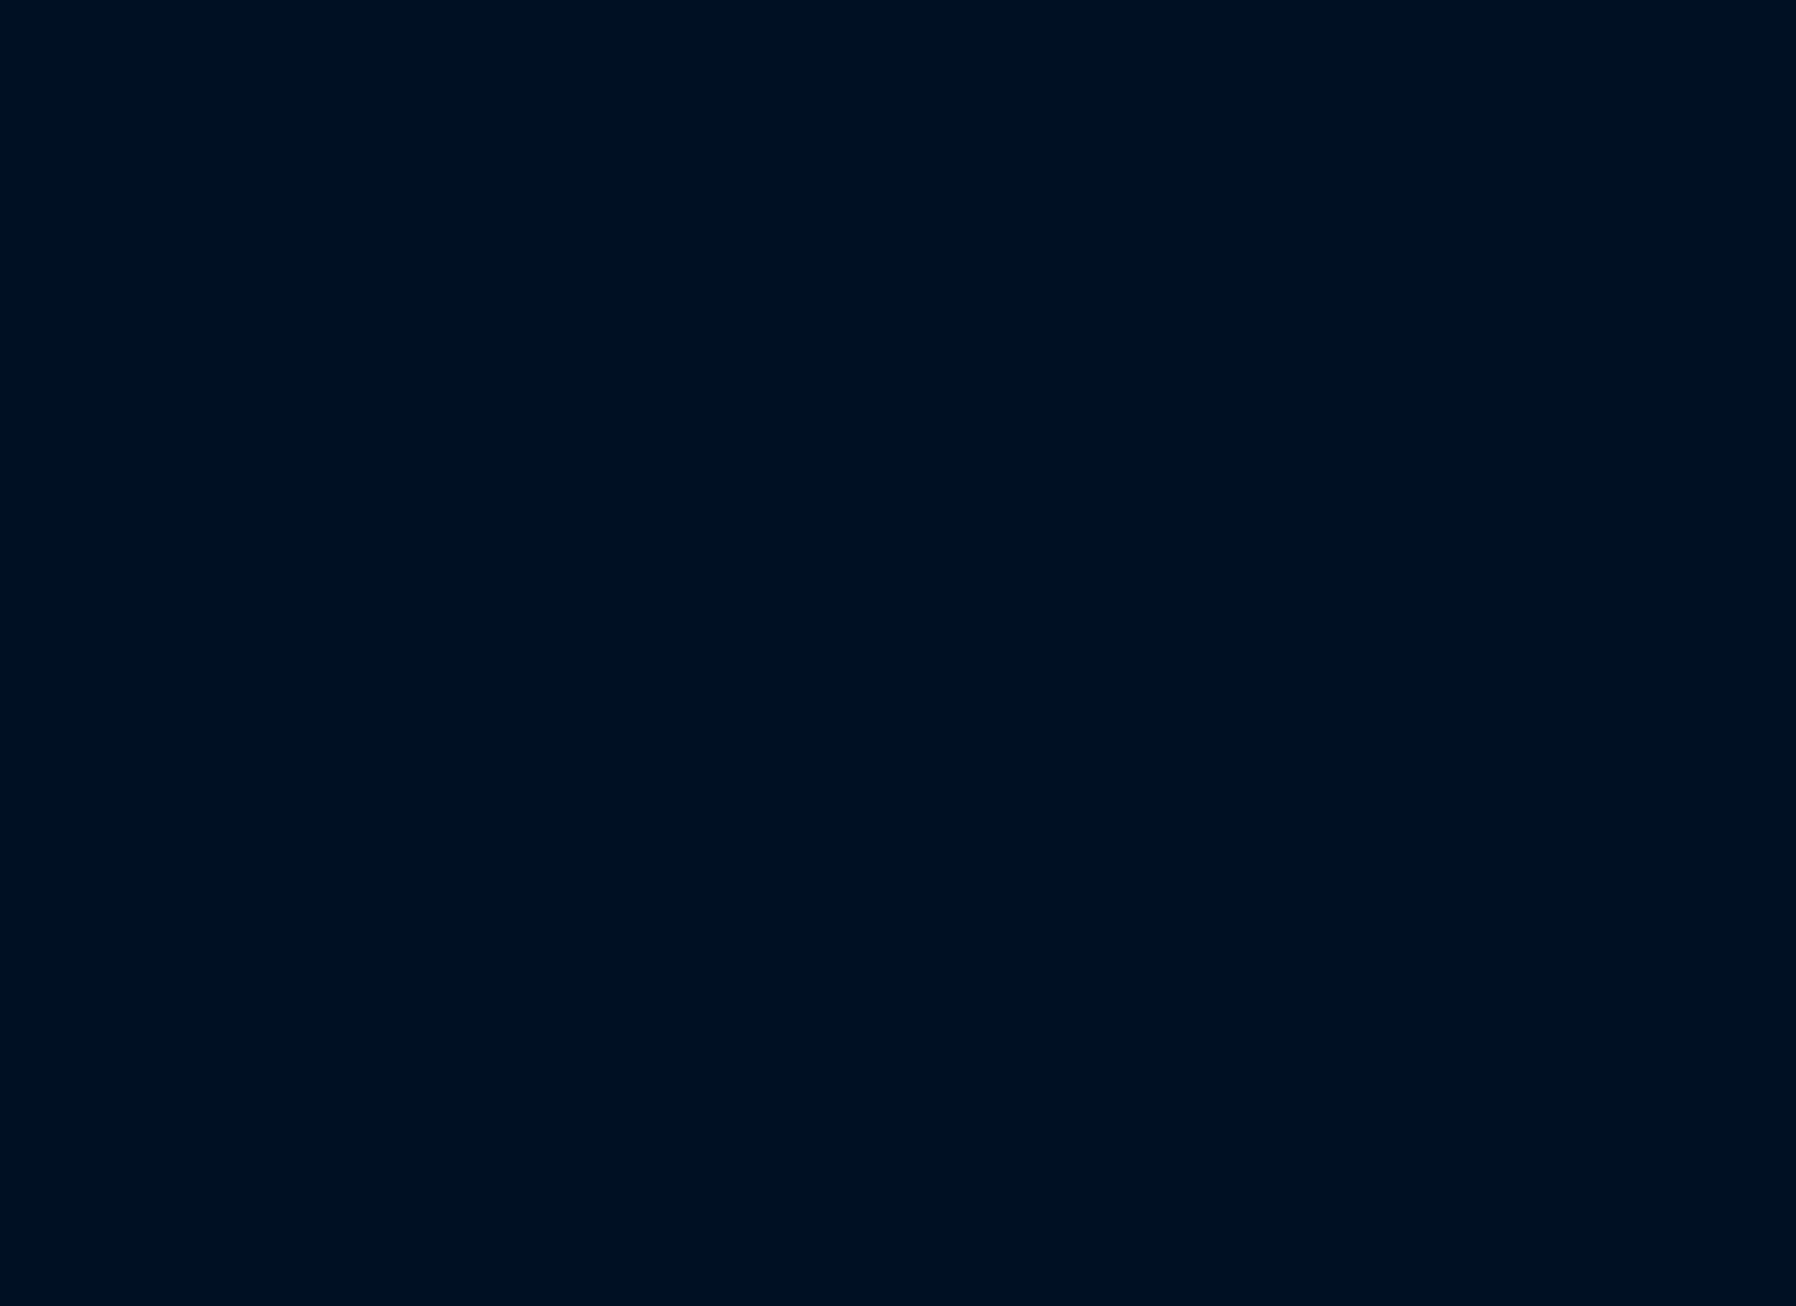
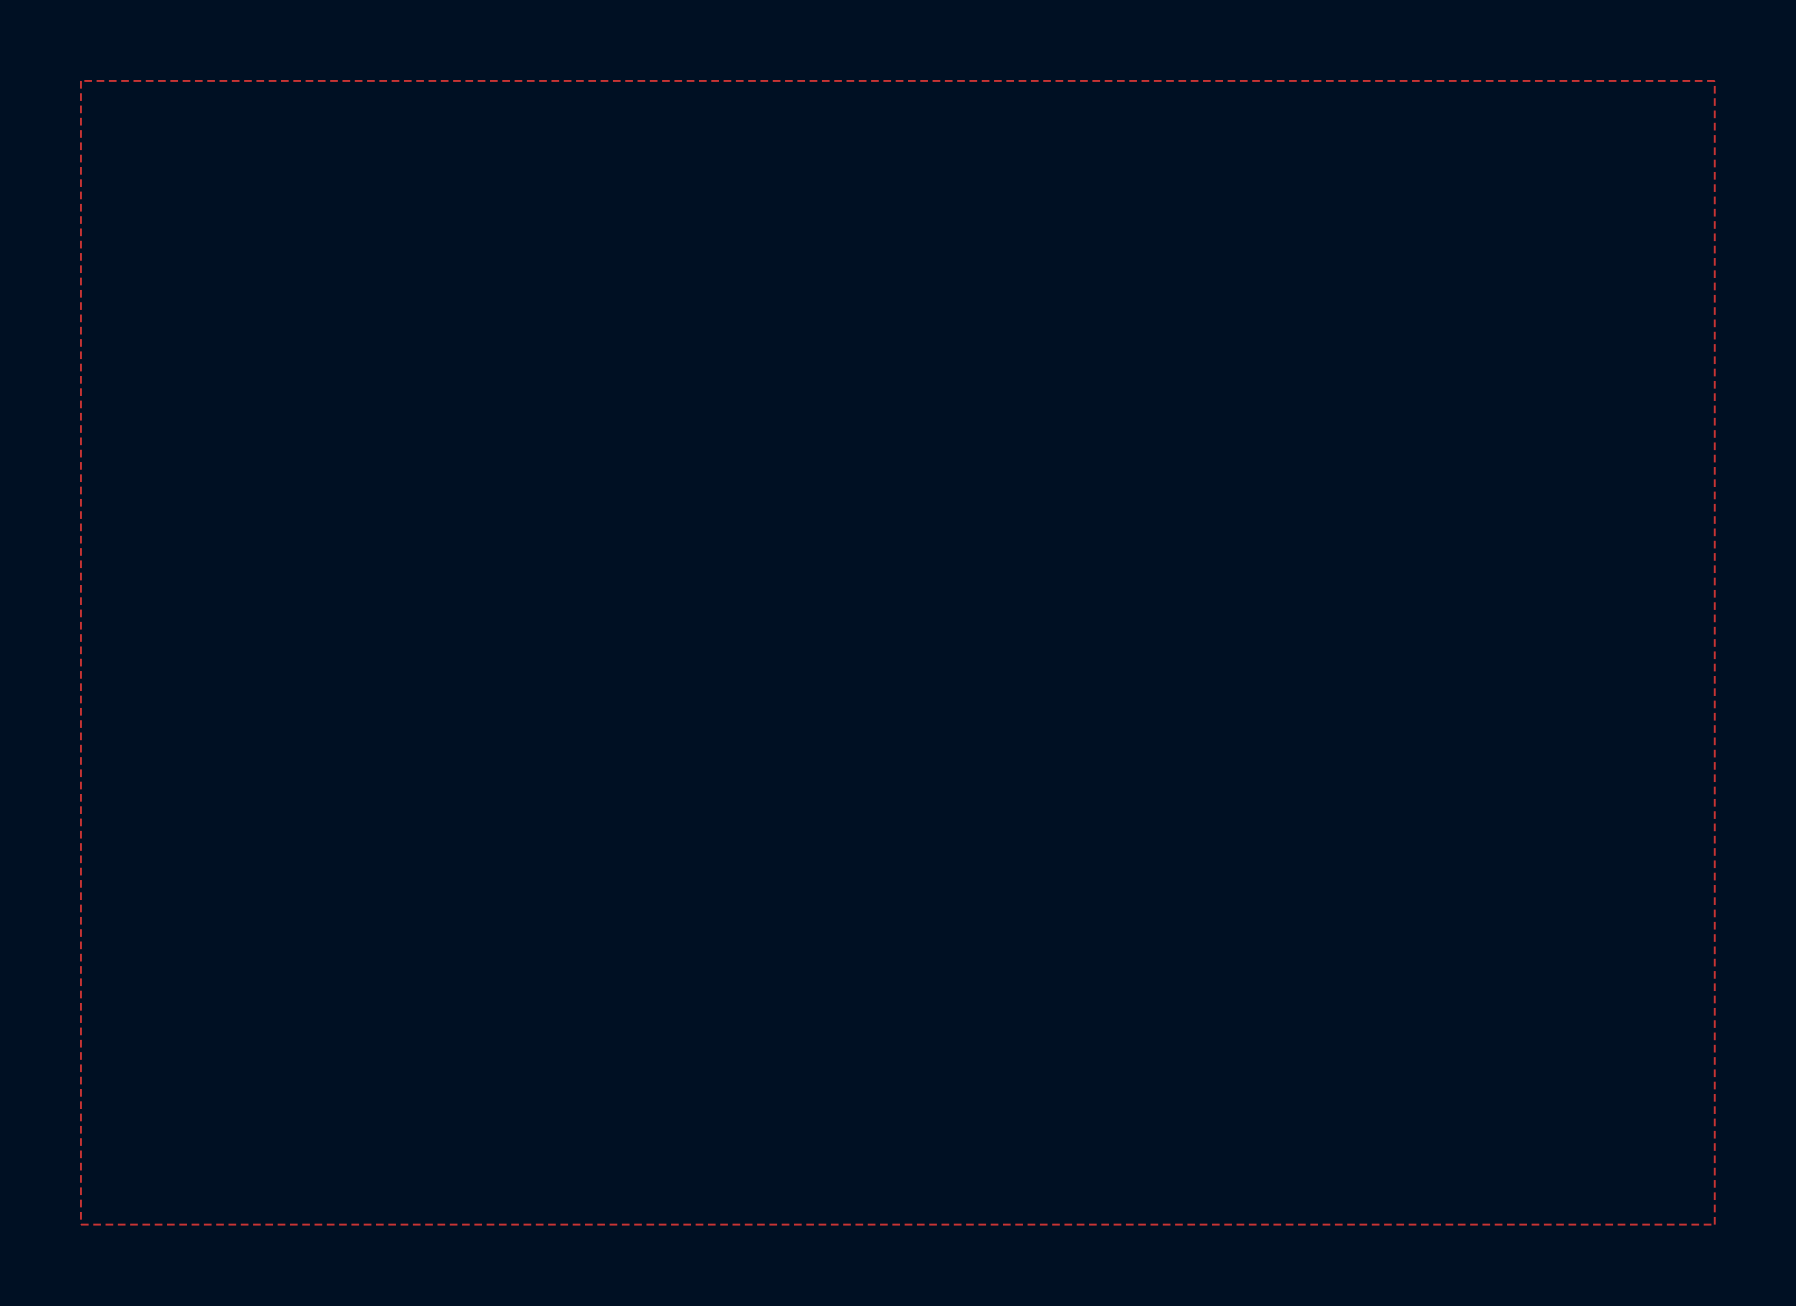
top zone outline: none -> (80, 80) (80, 1224) (1714, 1224) (1714, 80) (80, 80)

